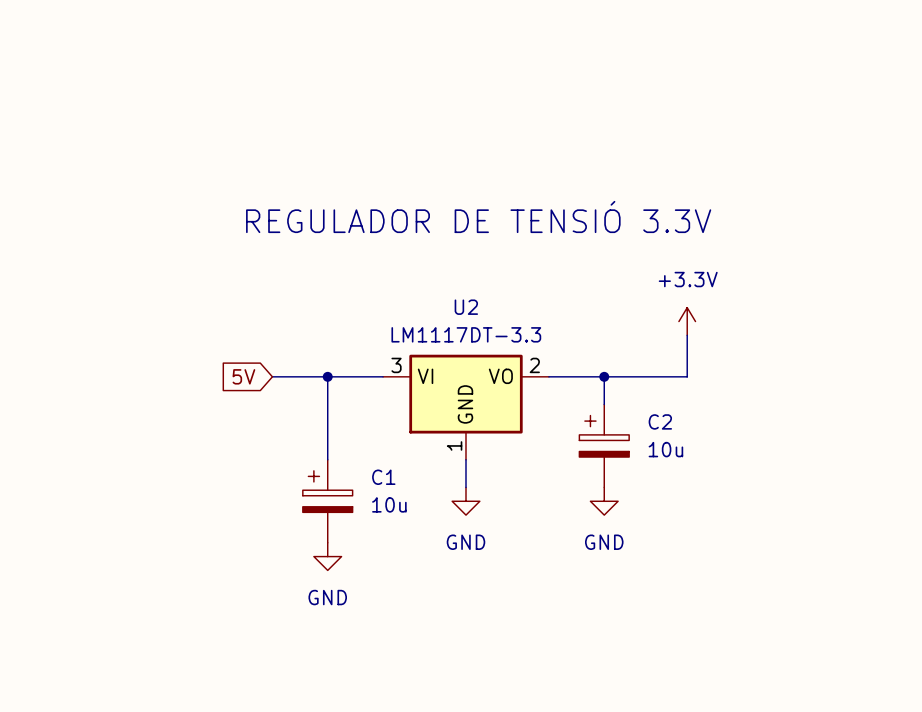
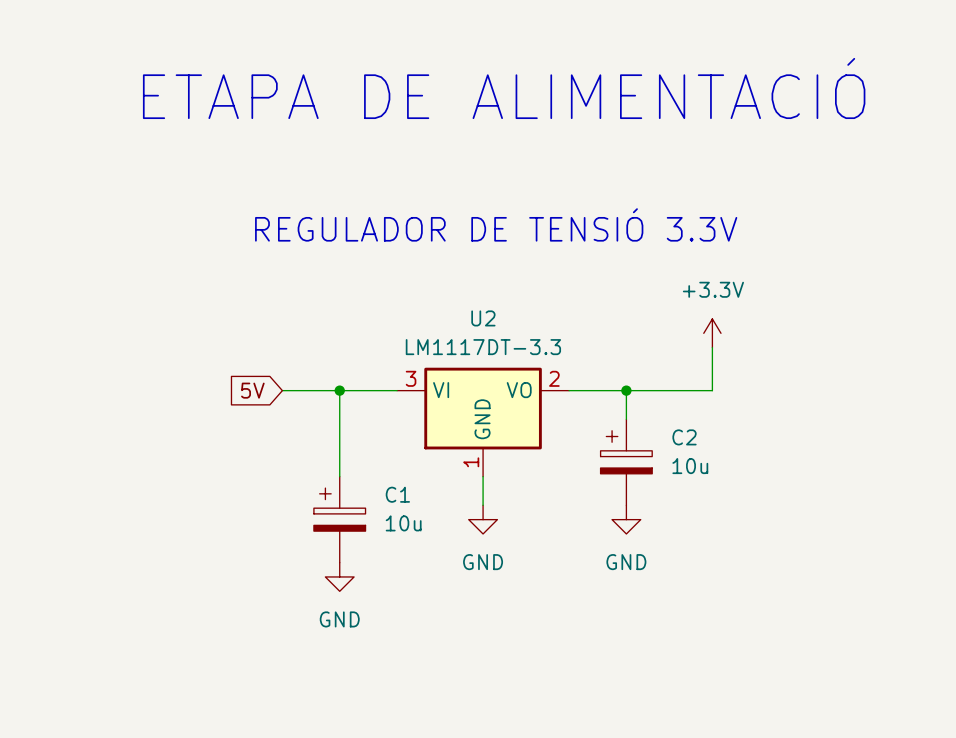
text: none -> ETAPA DE ALIMENTACIÓ (504, 88)

